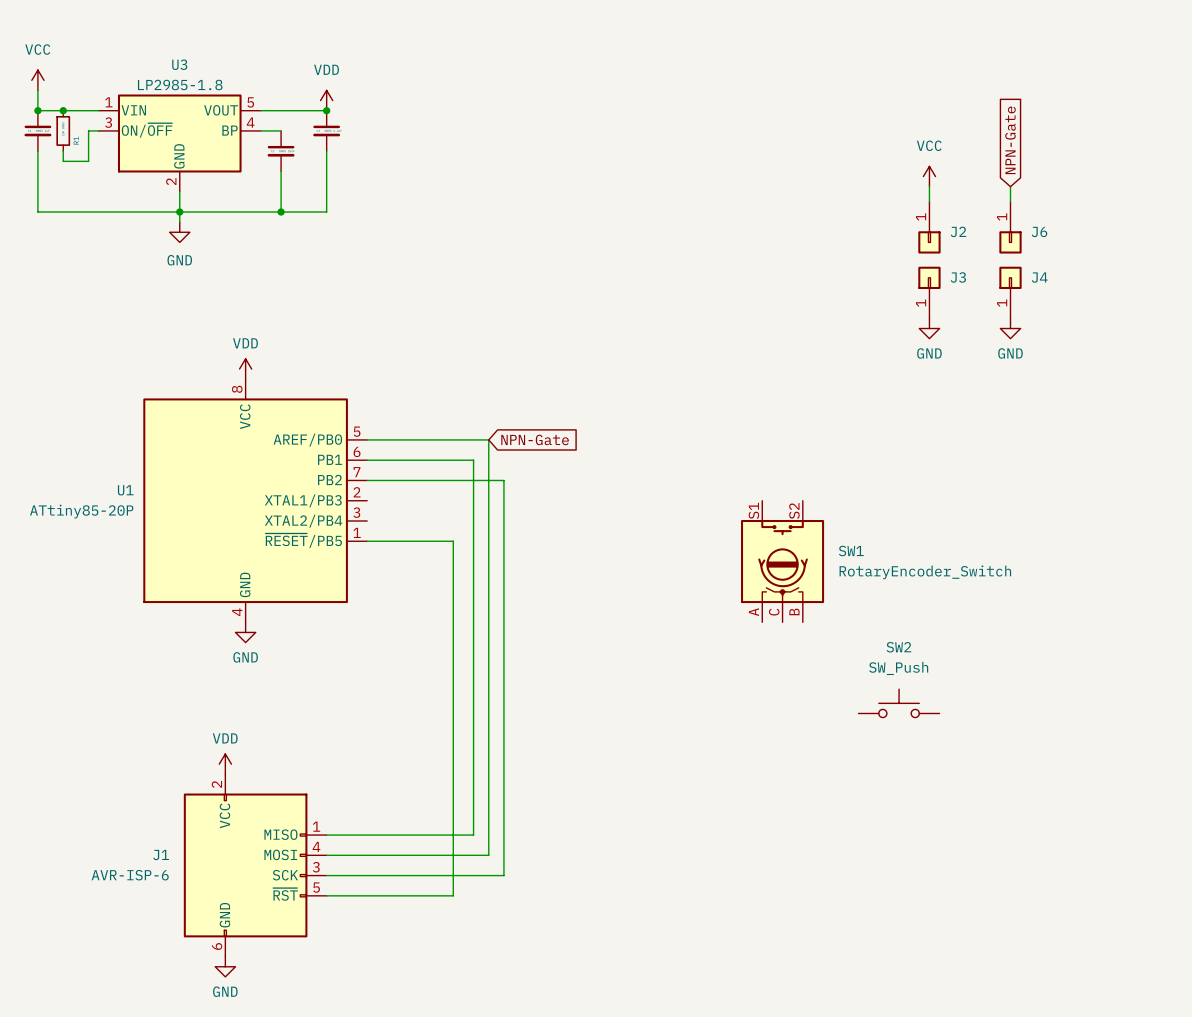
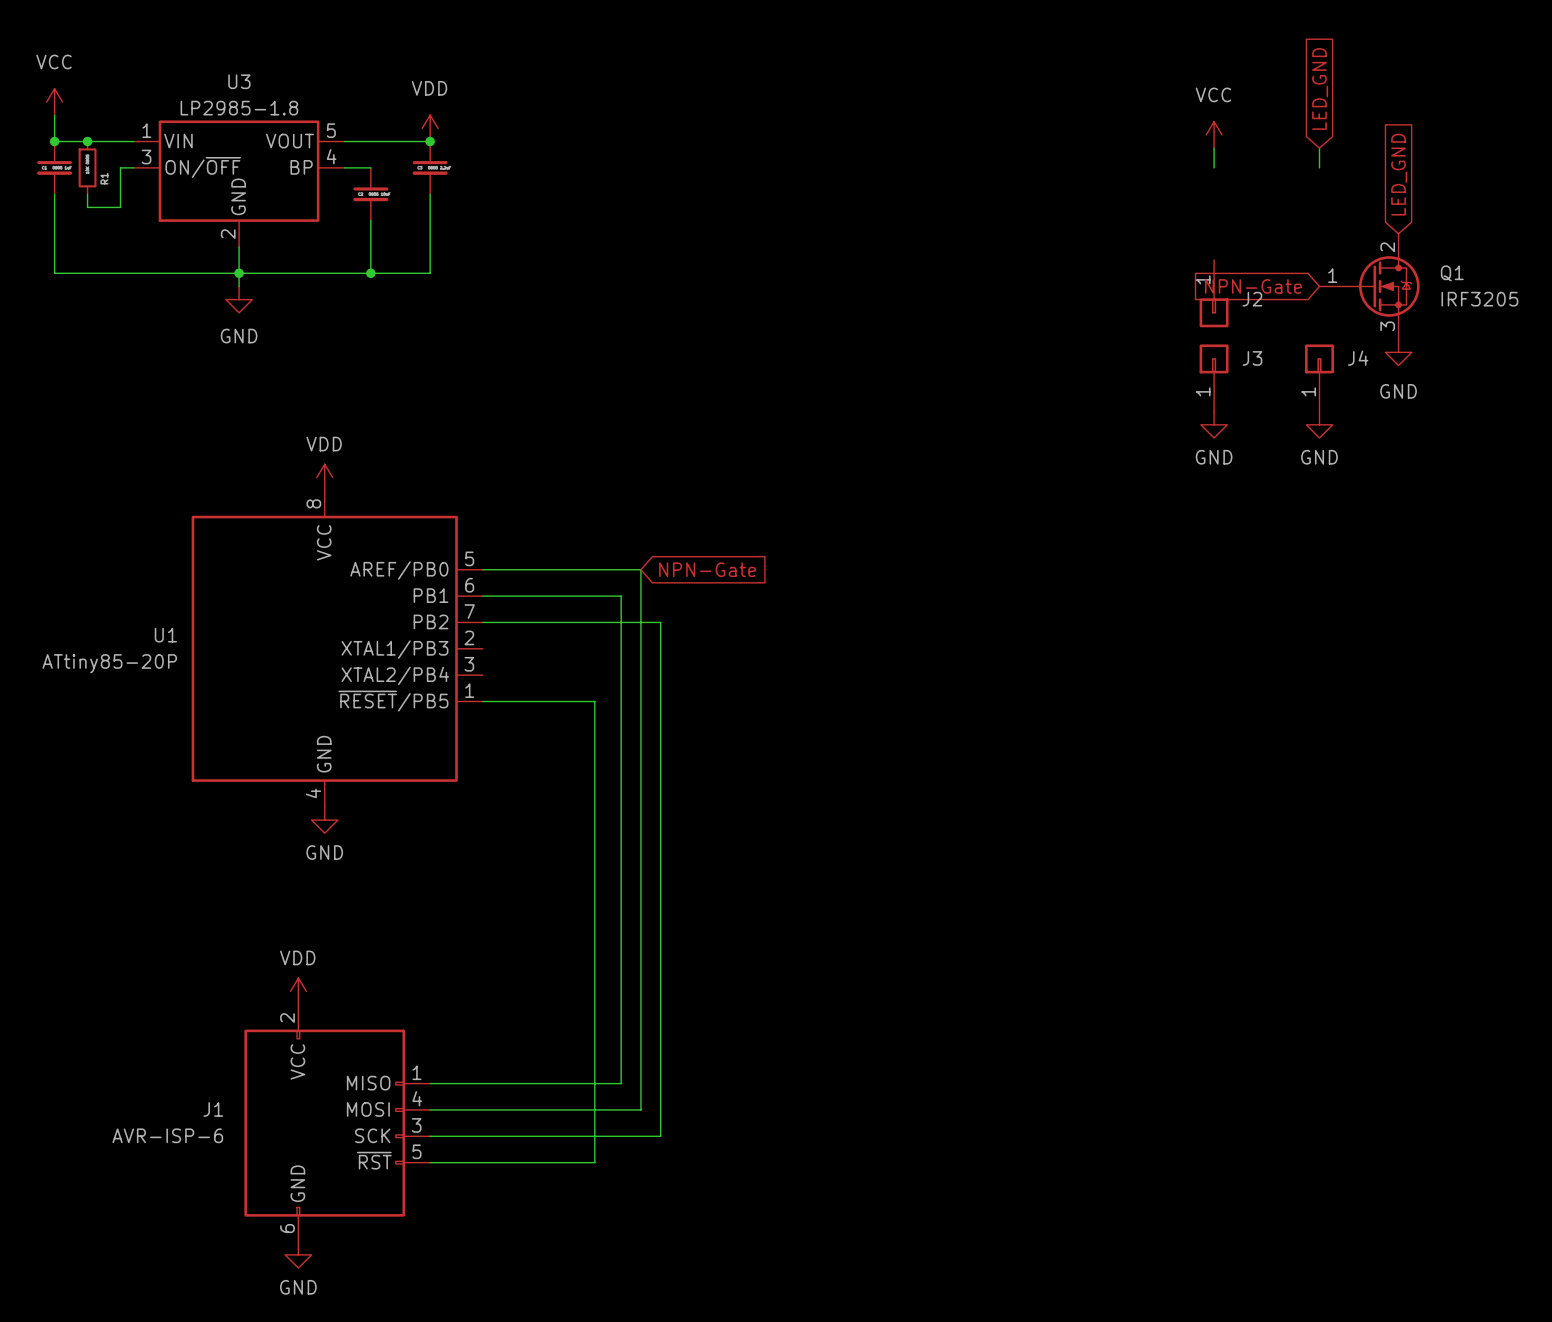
global label: none -> LED_GND (1320, 88)
global label: none -> LED_GND (1399, 174)
global label rotation: 0° (1010, 140) -> 90° counterclockwise (1253, 286)
power symbol position: VCC (929, 176) -> VCC (1214, 134)
wire: (929, 186) (929, 201) -> (1214, 148) (1214, 167)
wire: (1010, 186) (1010, 201) -> (1319, 148) (1319, 167)
Q1: none -> IRF3205 (1369, 286)
J6: (1010, 227) -> none
power symbol: none -> GND (1398, 352)
SW1: RotaryEncoder_Switch (782, 561) -> none
SW2: SW_Push (899, 703) -> none

